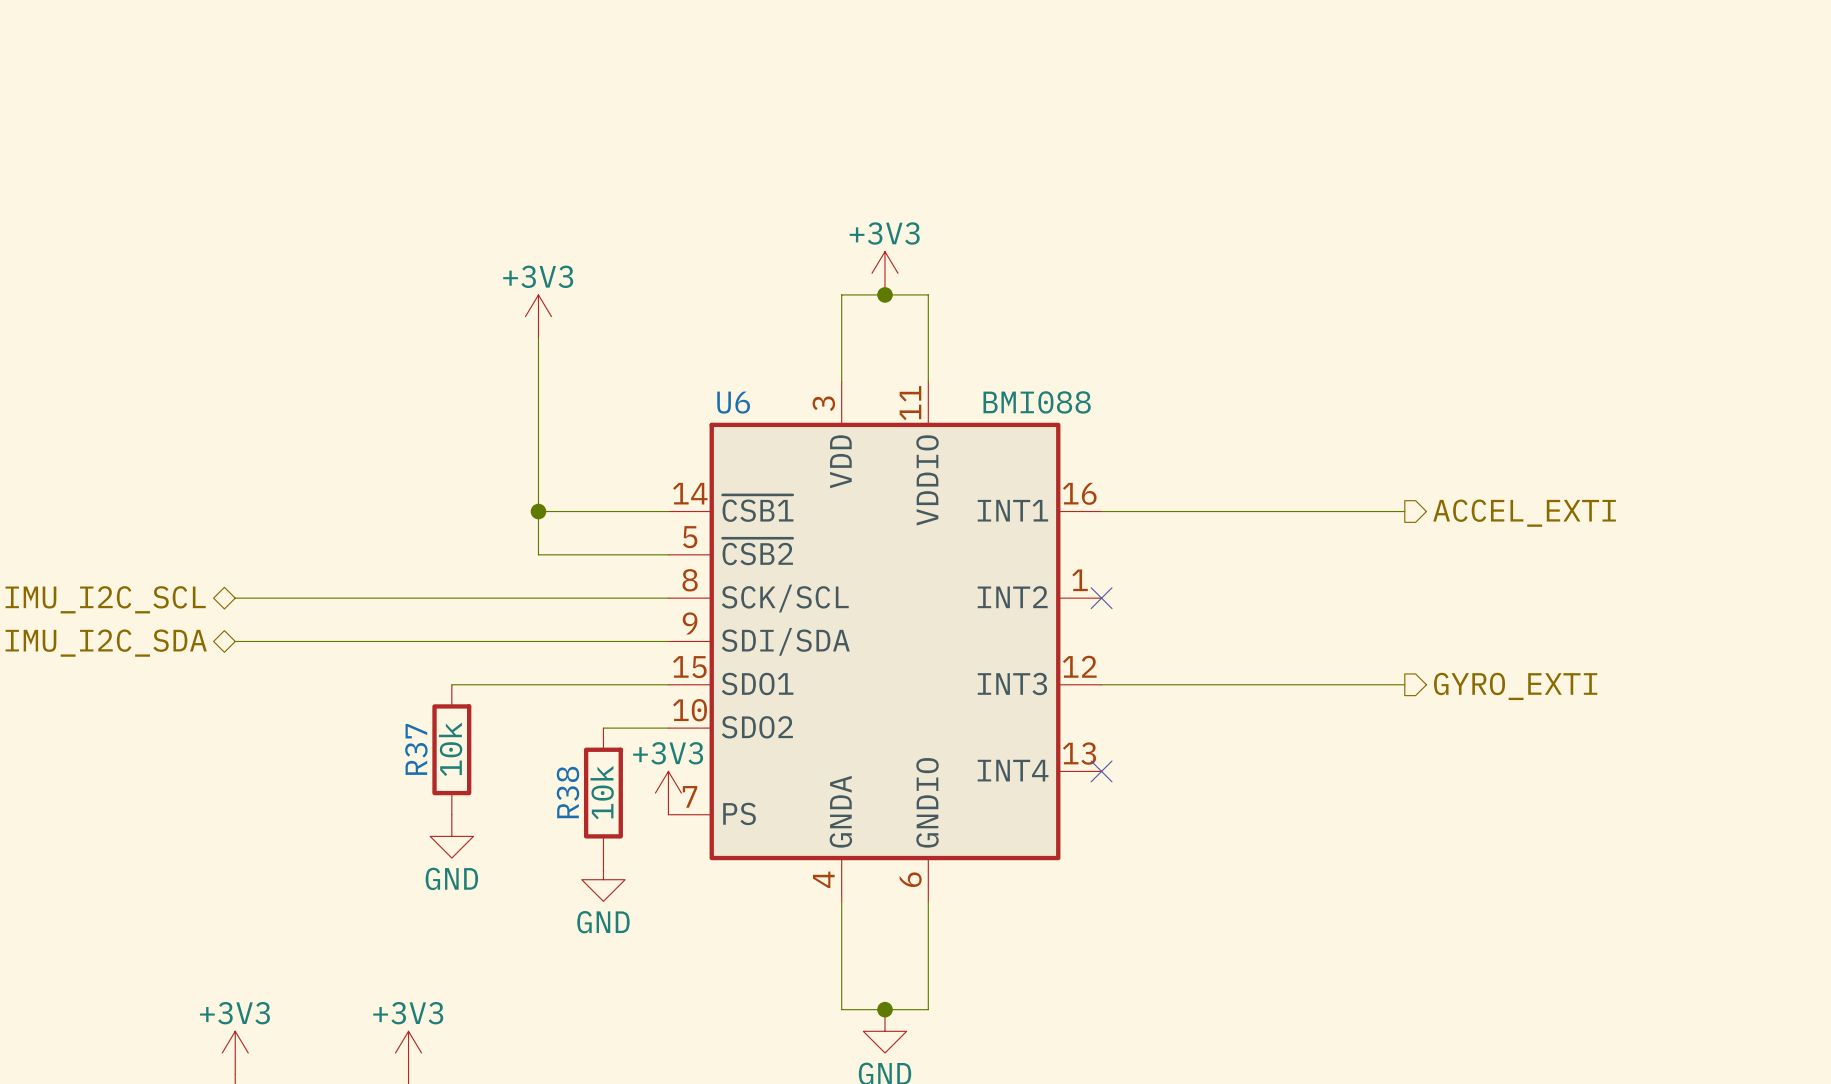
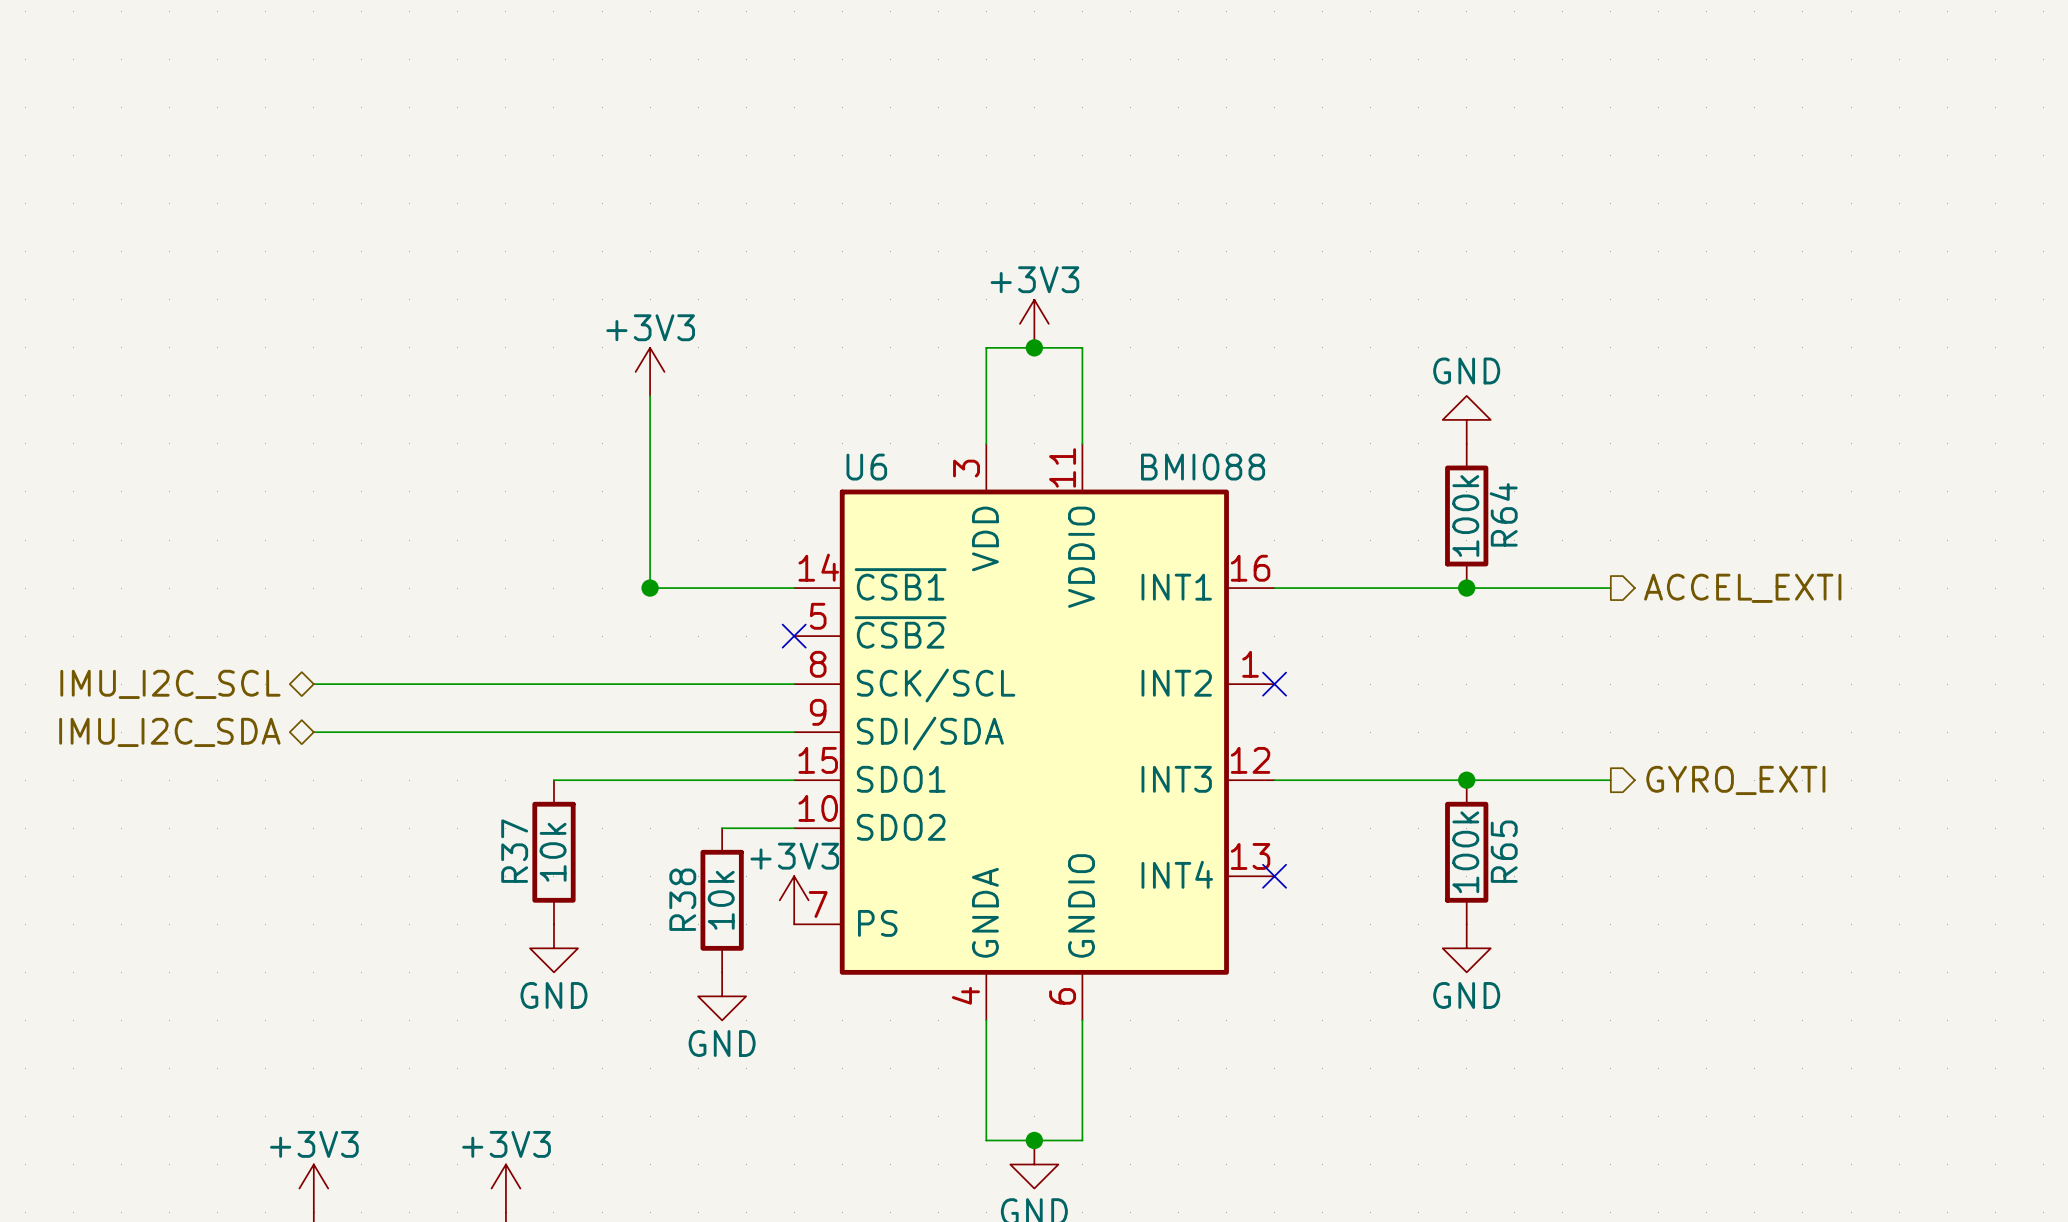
power symbol: none -> GND (1466, 419)
R64: none -> 100k (1466, 516)
wire: (538, 511) (538, 554) (668, 554) -> none
junction: none -> (1466, 588)
no-connect mark: none -> (794, 636)
junction: none -> (1466, 780)
R65: none -> 100k (1466, 852)
power symbol: none -> GND (1466, 948)

